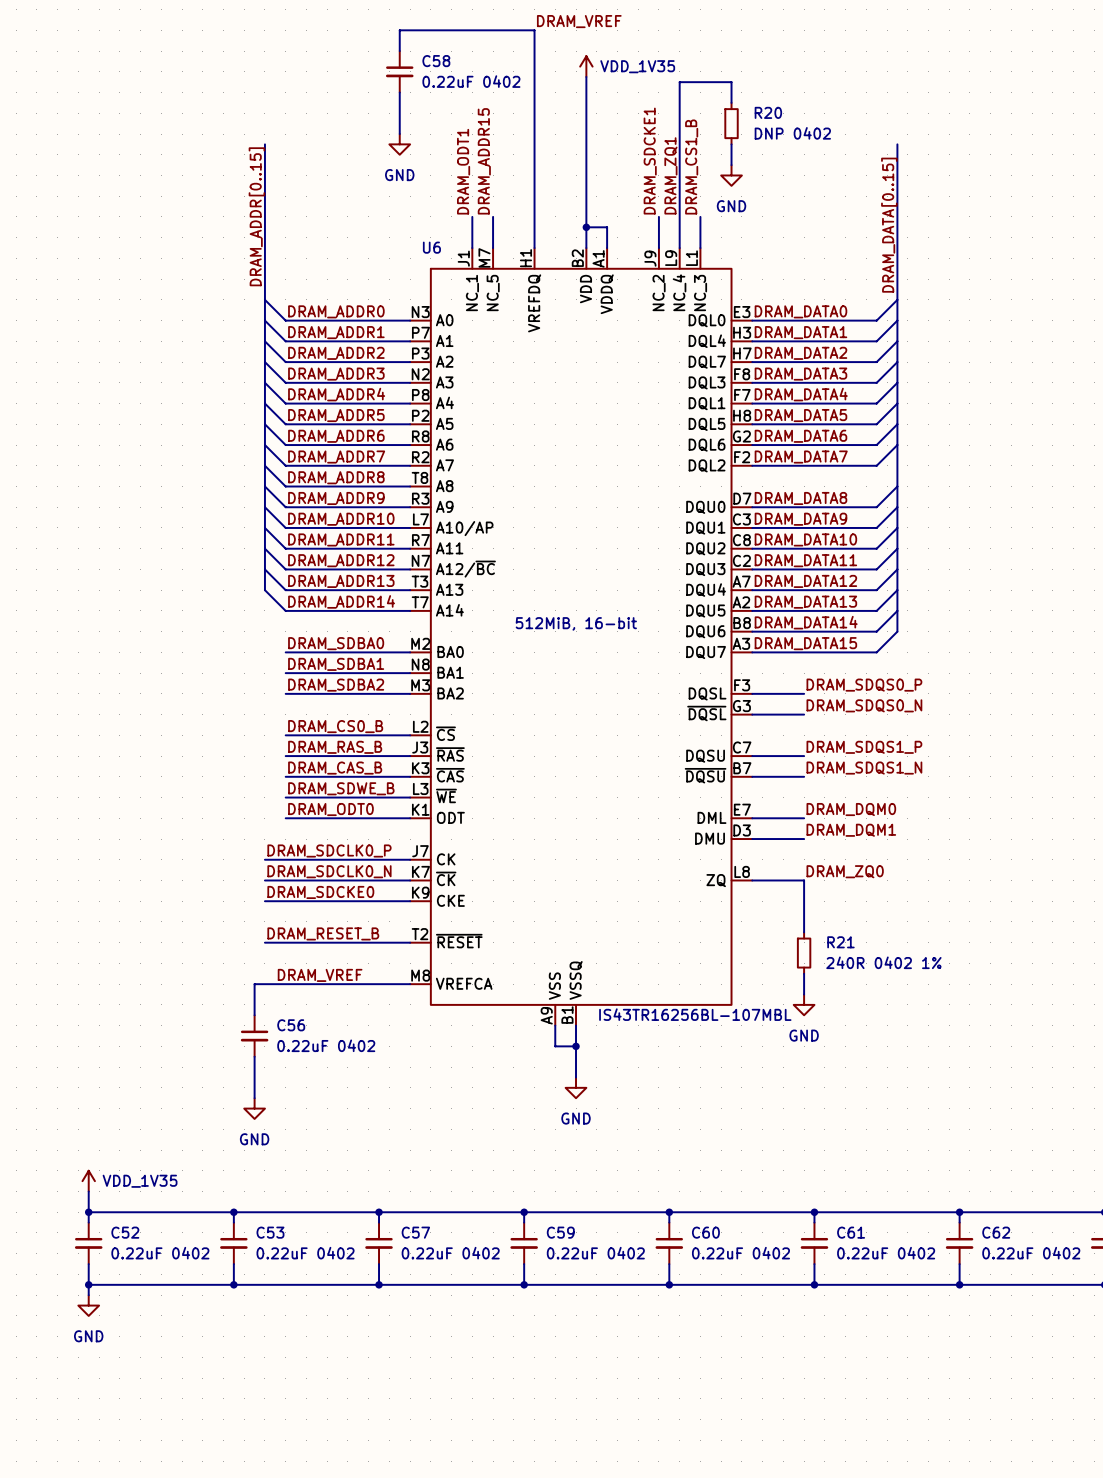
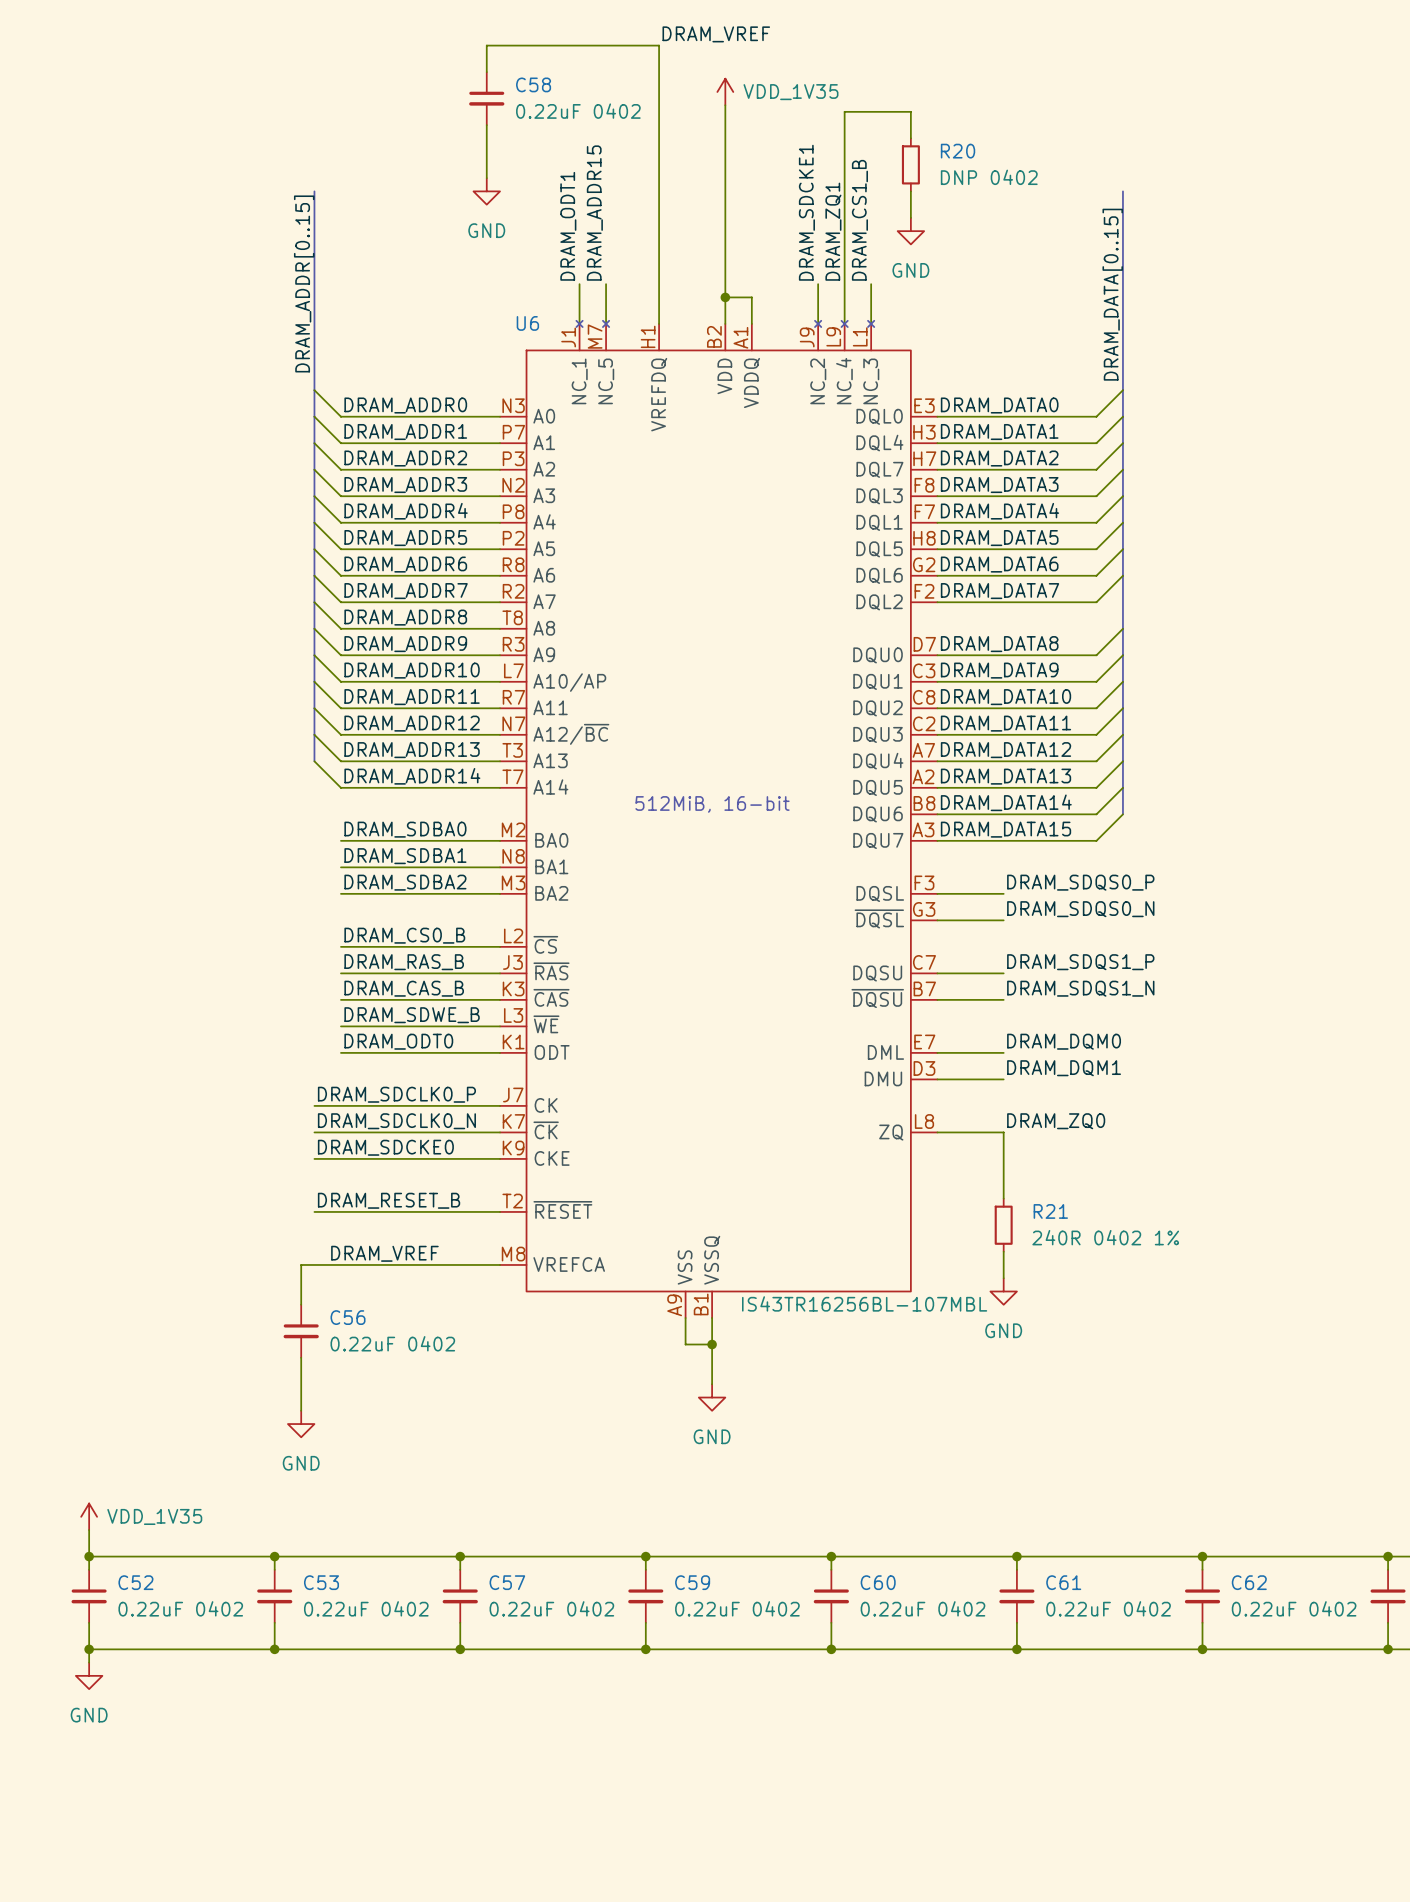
U6 symbol: [410, 248, 753, 1026] -> [500, 320, 938, 1319]

